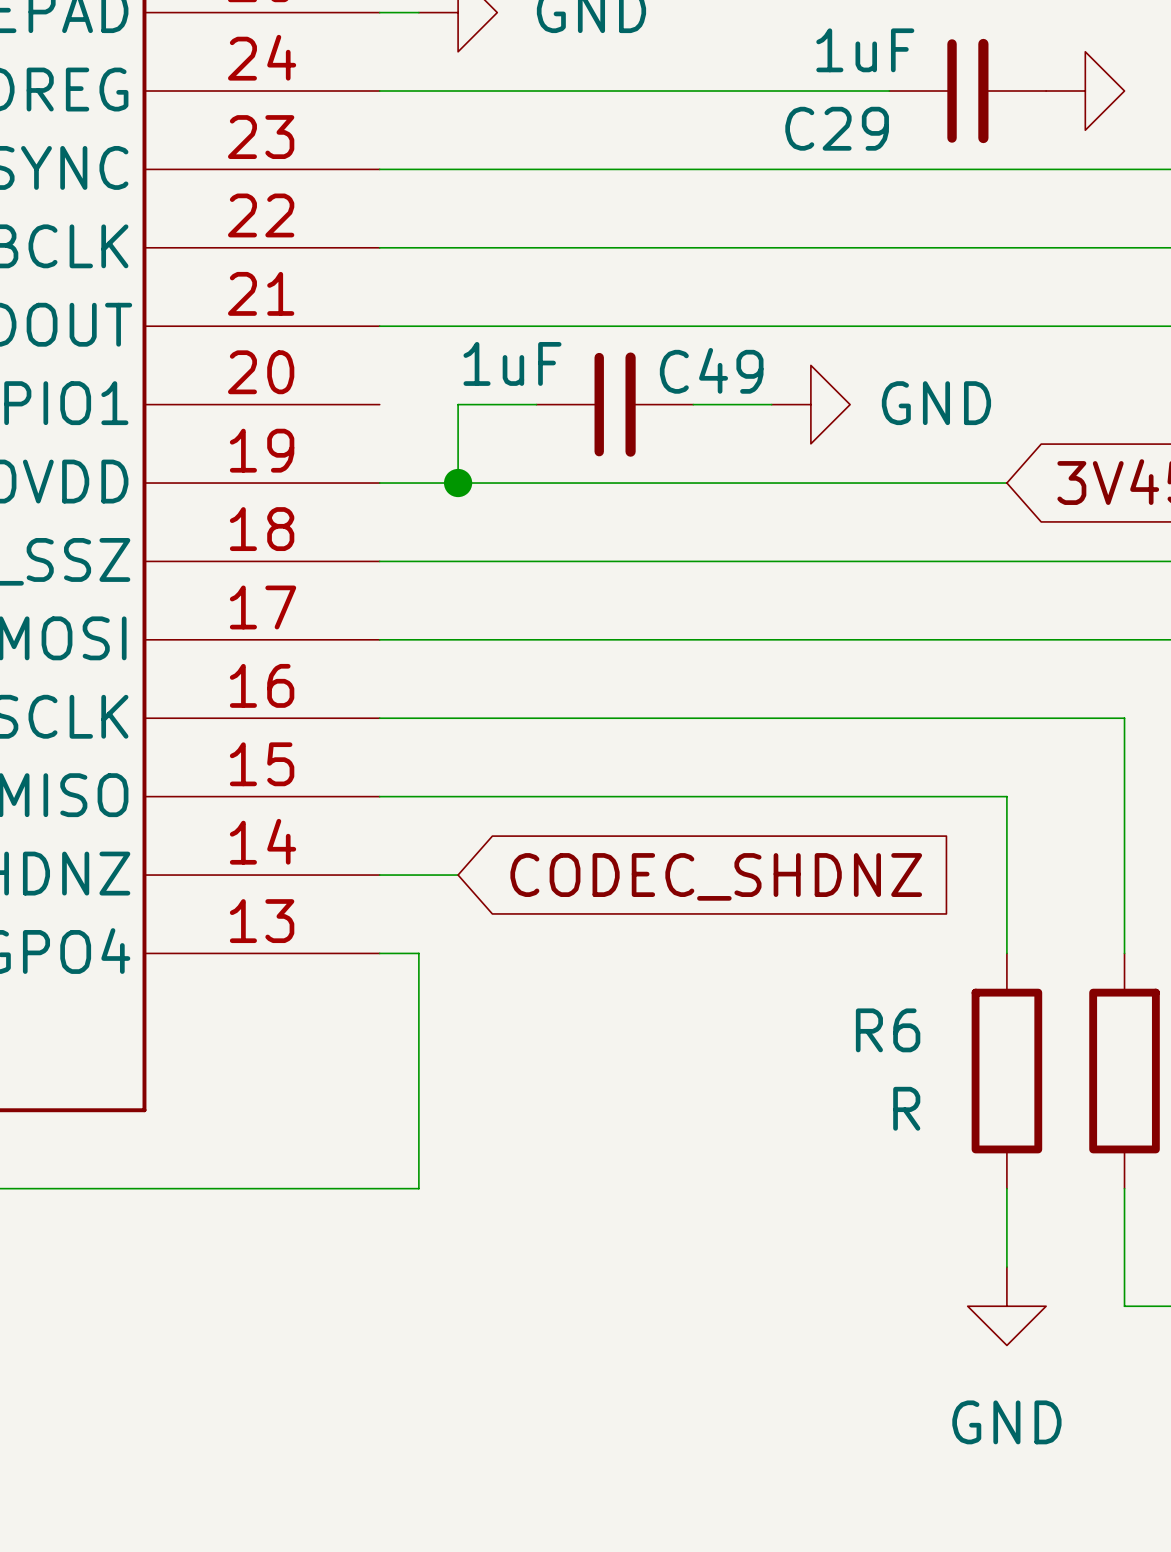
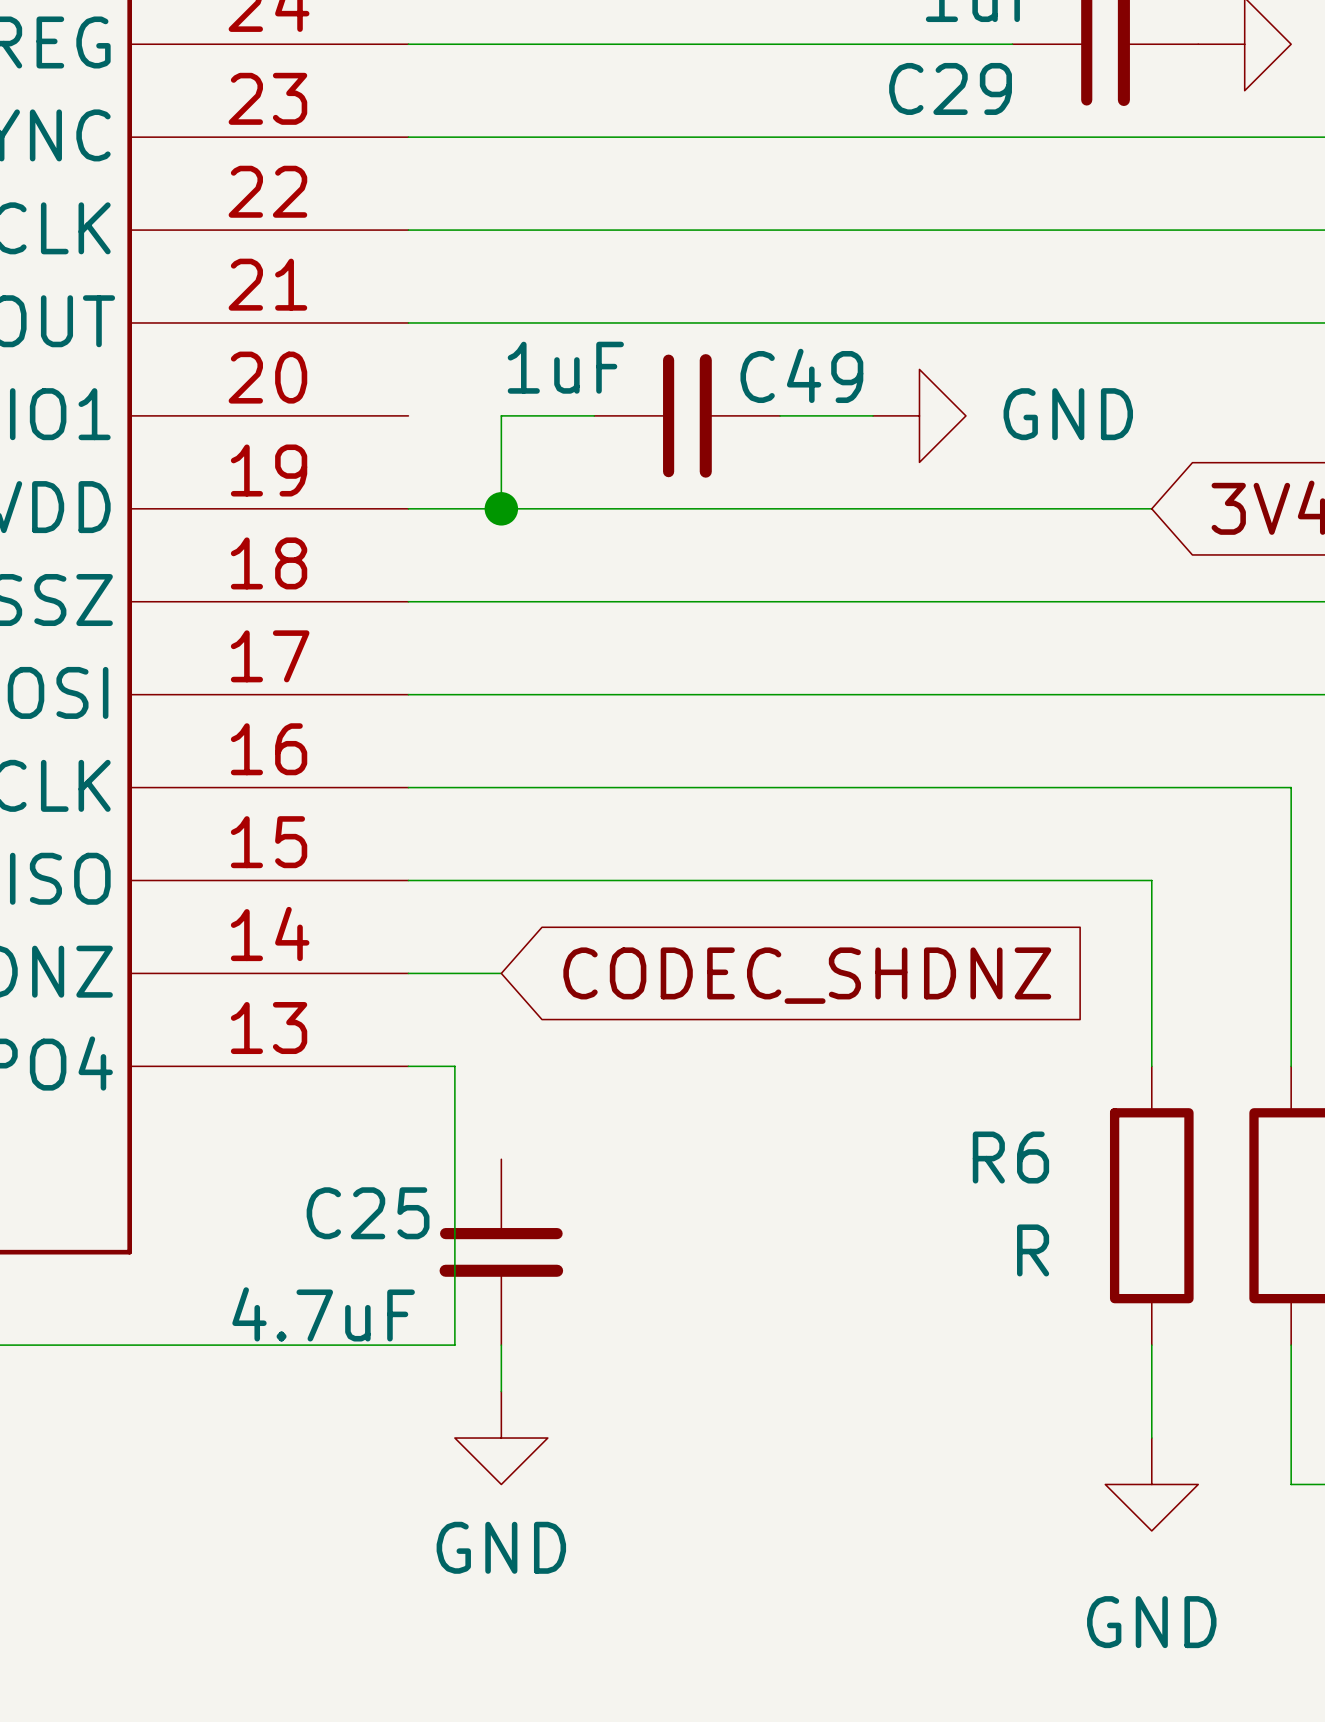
C25: none -> 4.7uF (501, 1252)
wire: none -> (501, 1345) (501, 1391)
power symbol: none -> GND (501, 1438)

